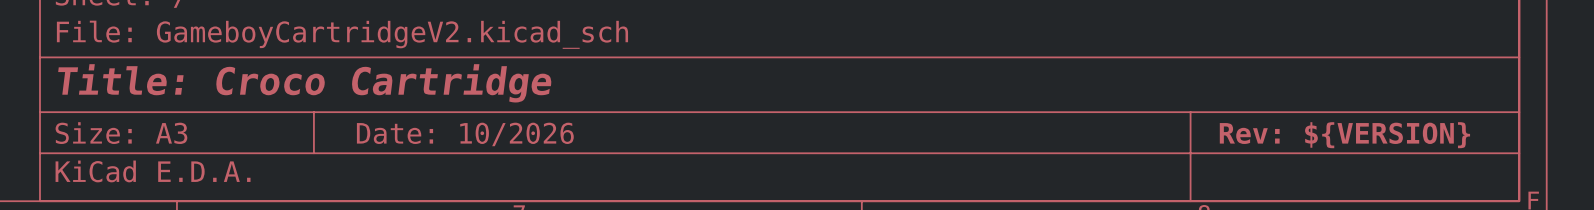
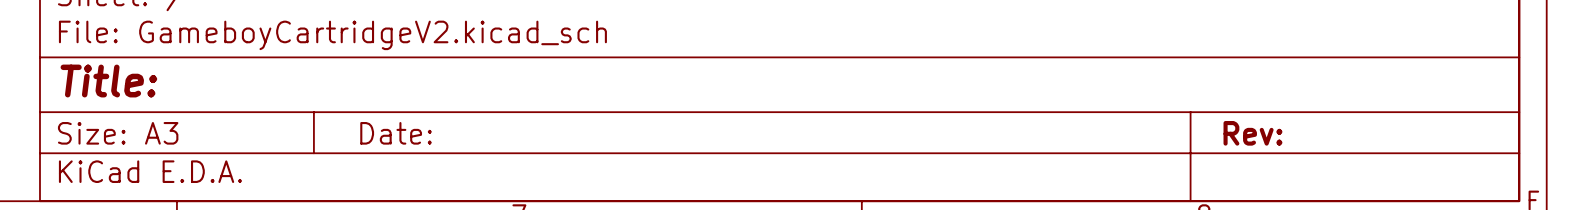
title block: Title: Croco Cartridge (304, 83) -> Title: (108, 81)
title block: Date: 10/2026 (465, 134) -> Date: (396, 133)
title block: Rev: ${VERSION} (1344, 135) -> Rev: (1252, 133)

